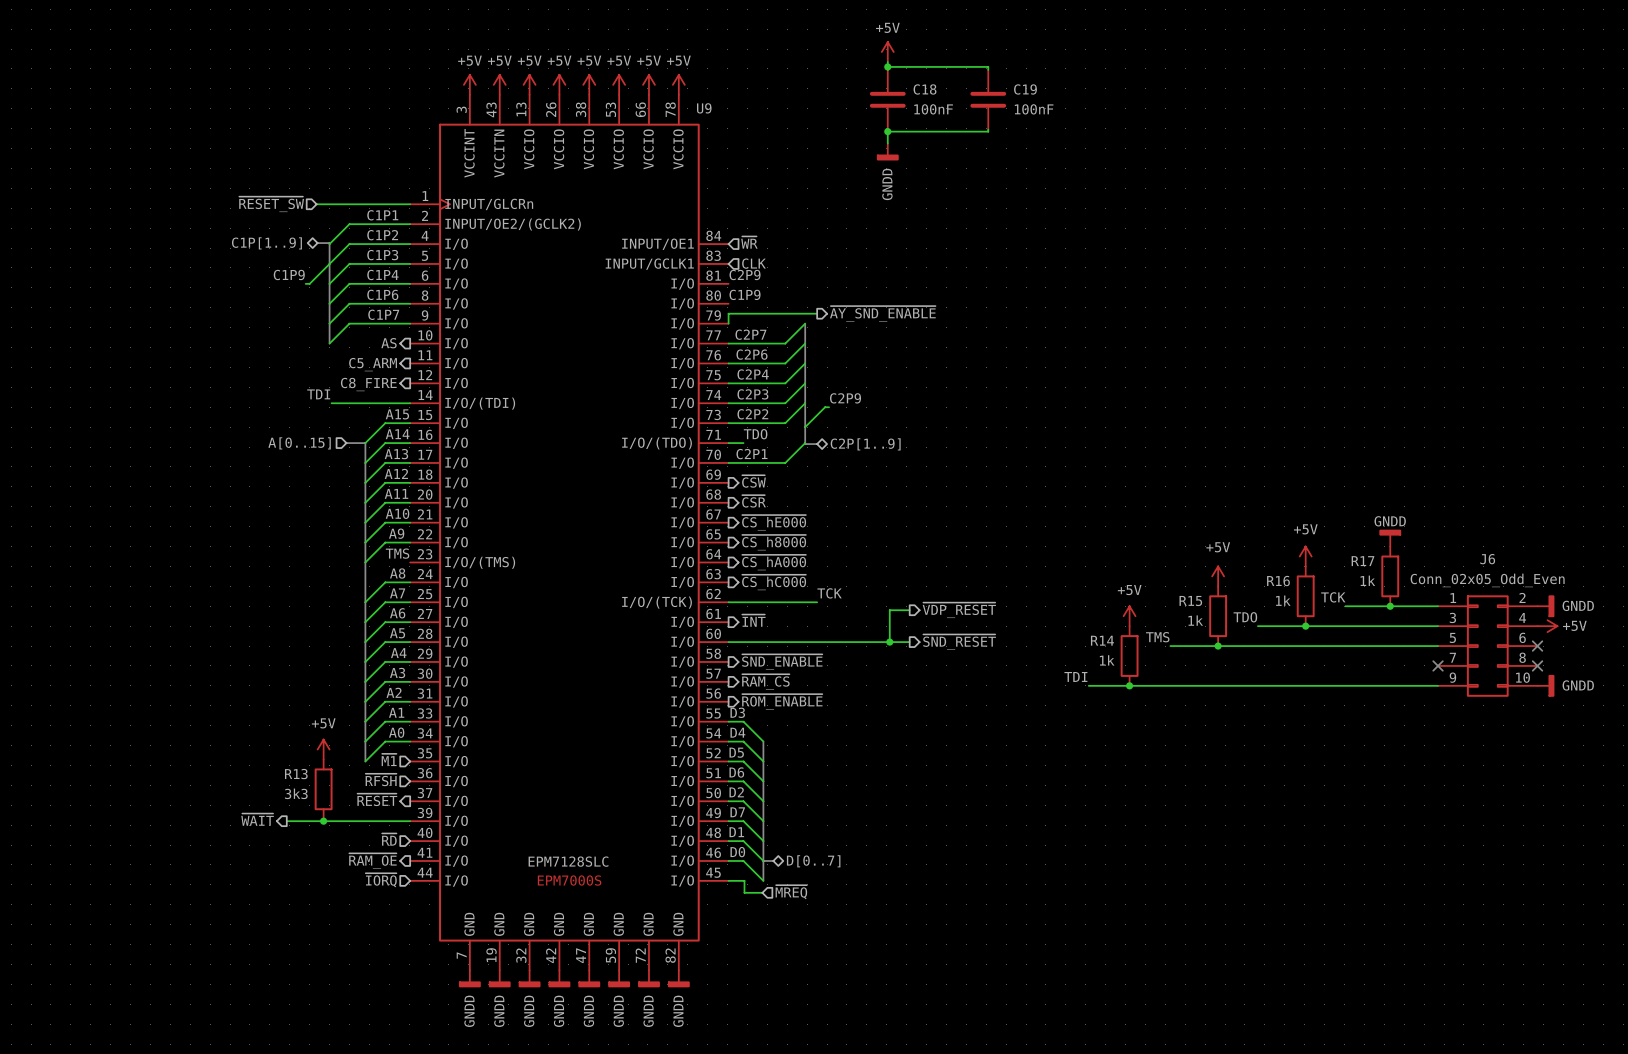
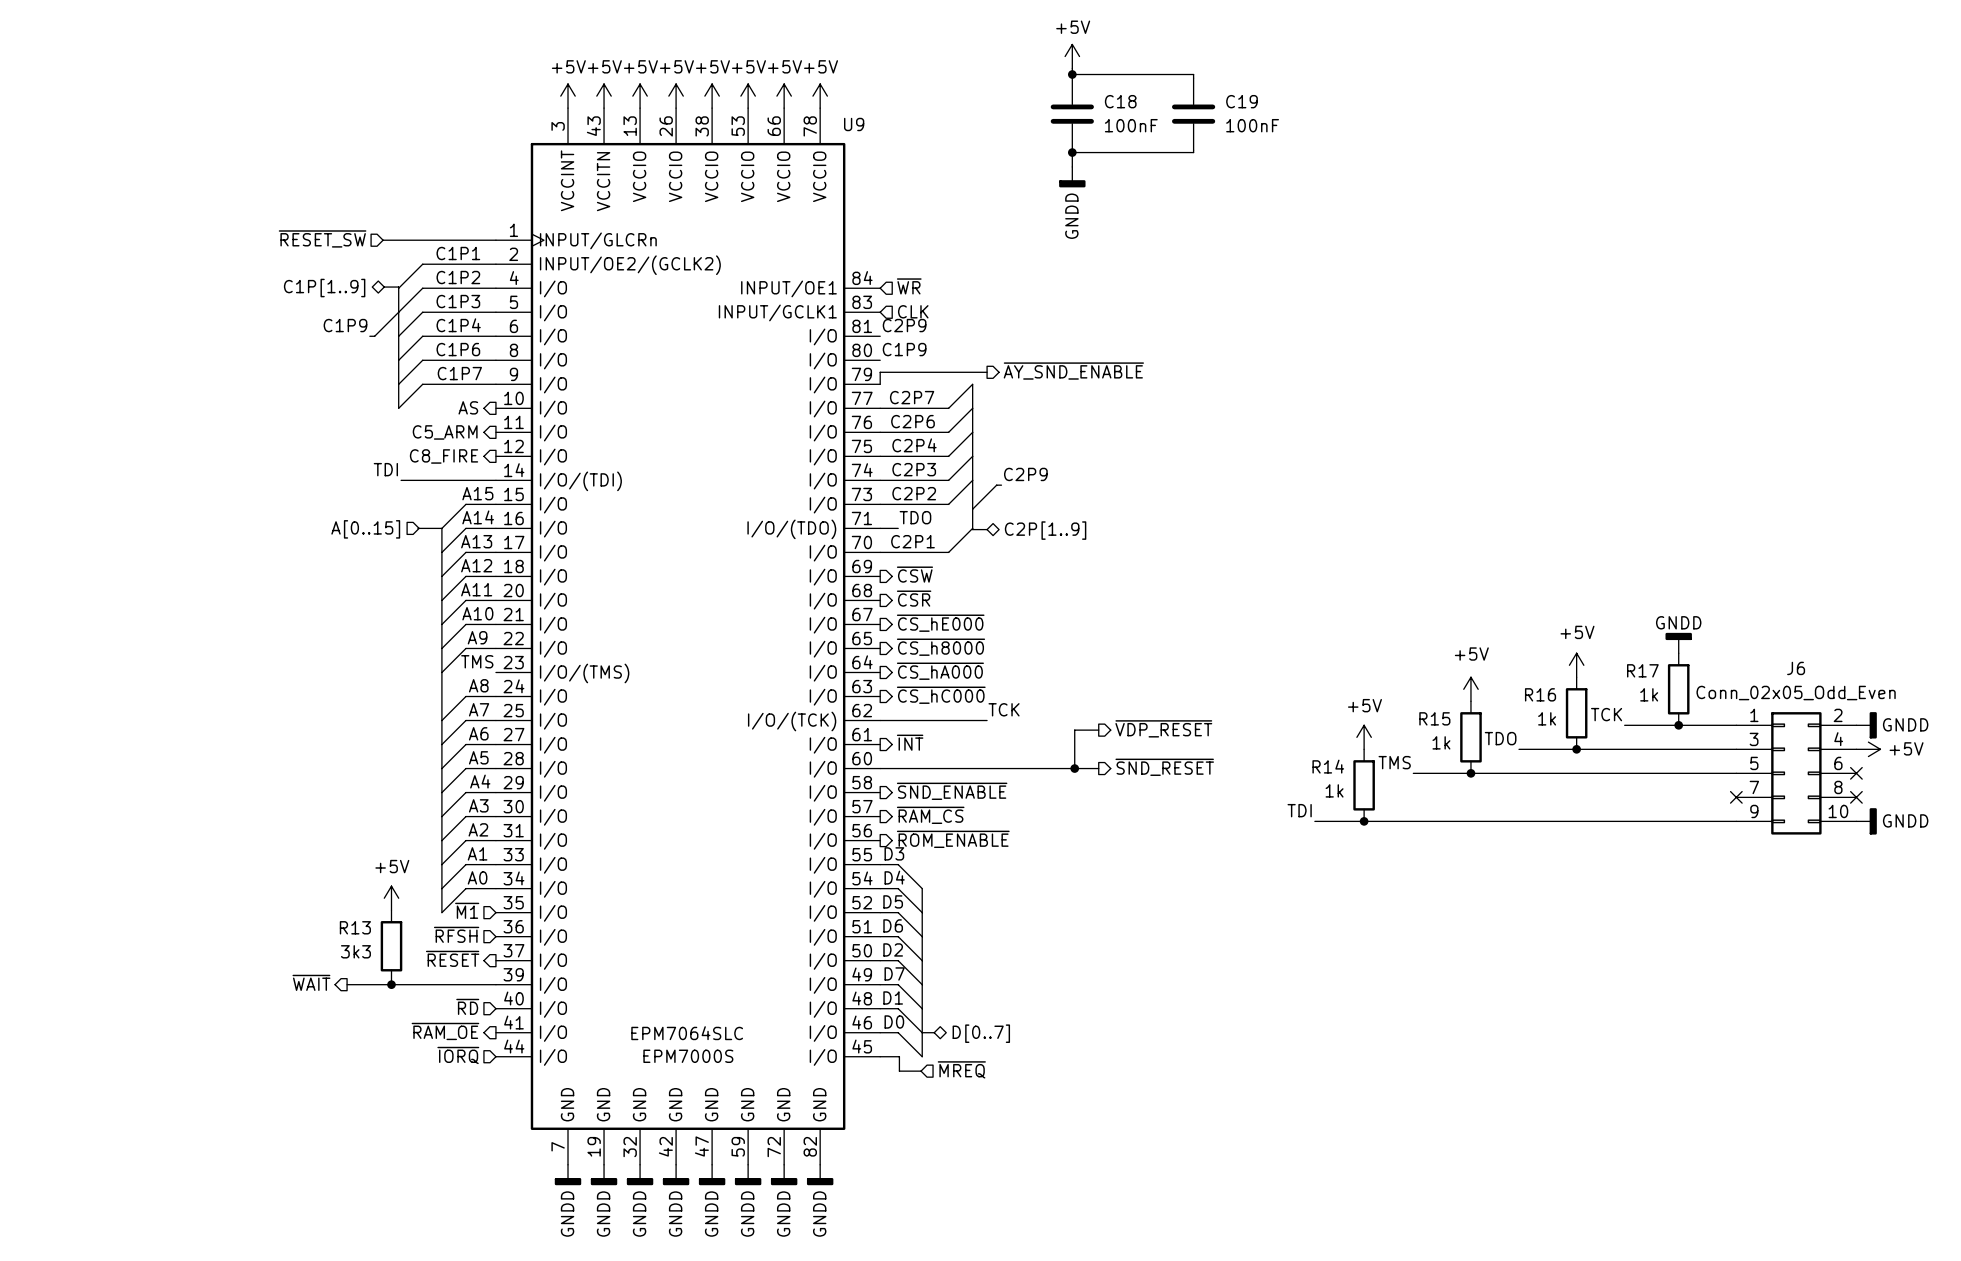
U9 value: EPM7128SLC (568, 861) -> EPM7064SLC (687, 1033)

